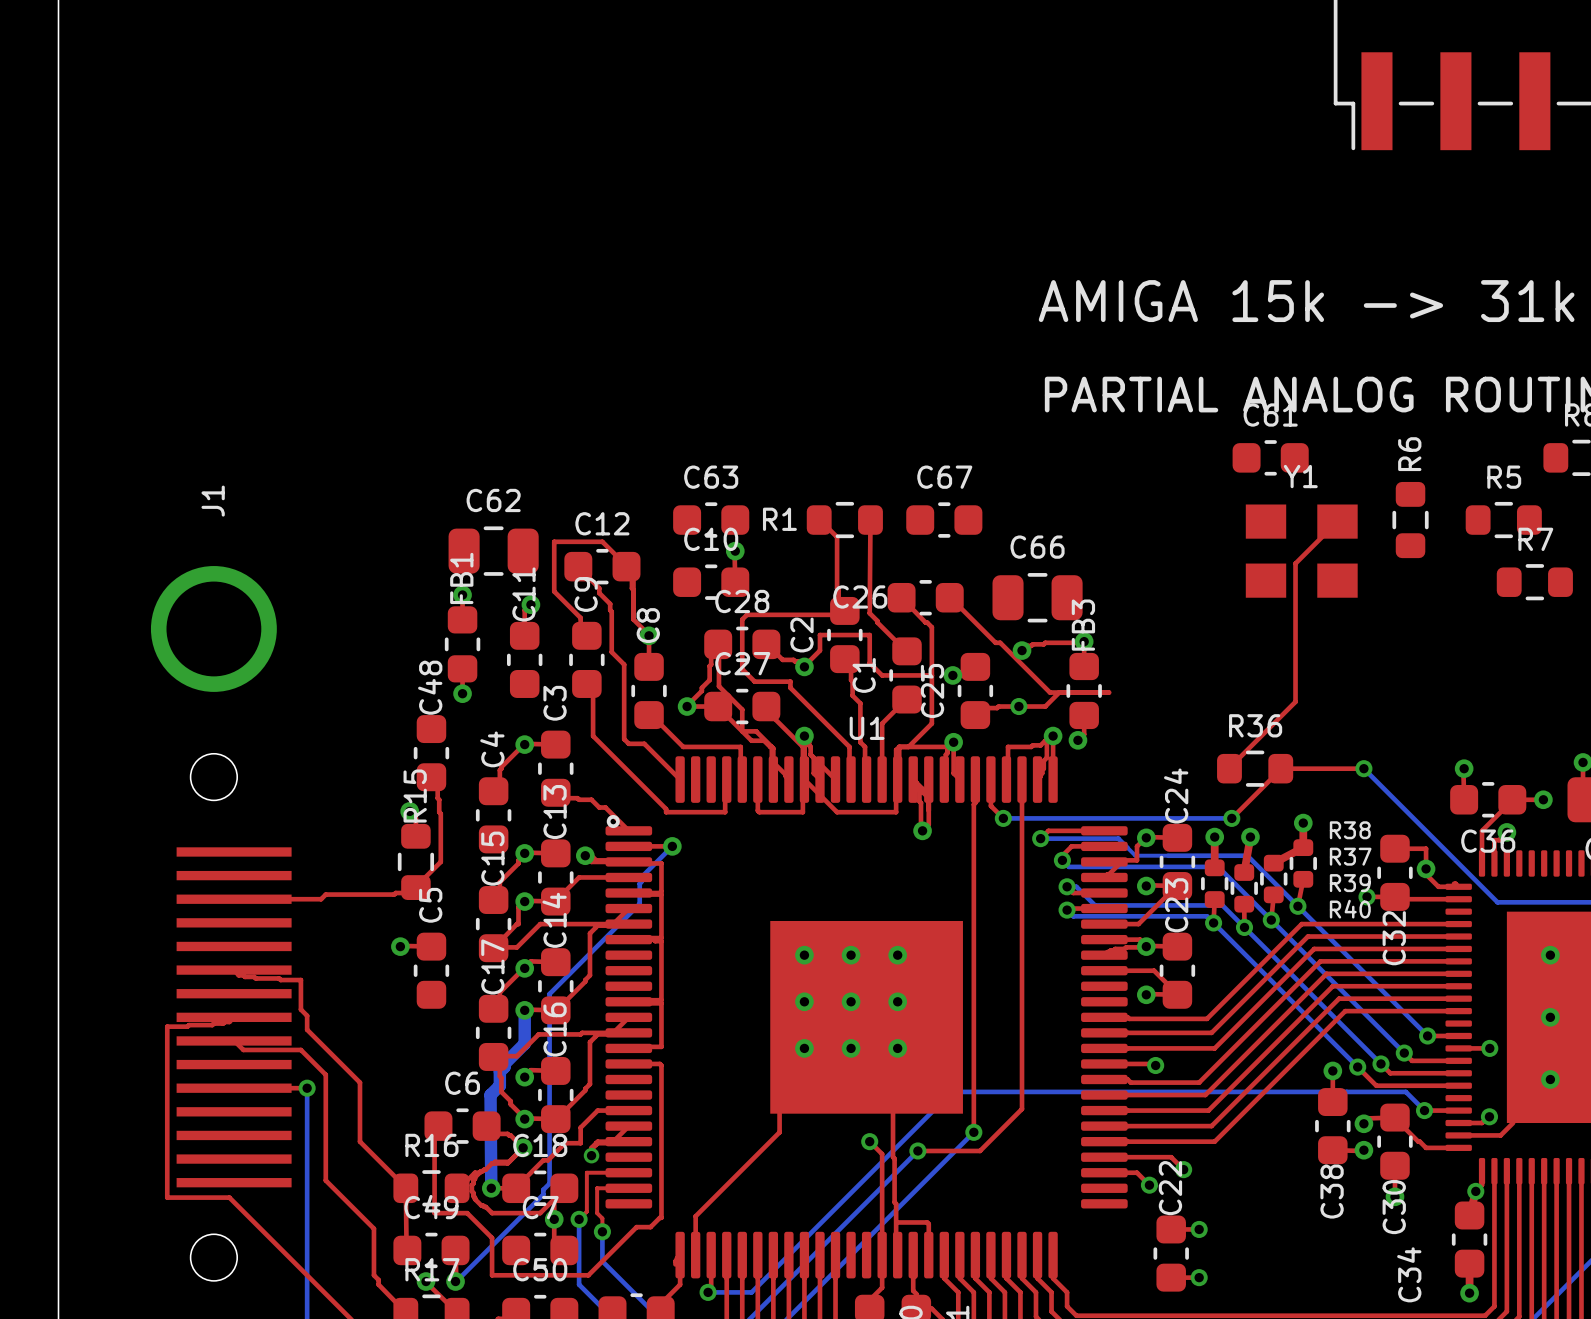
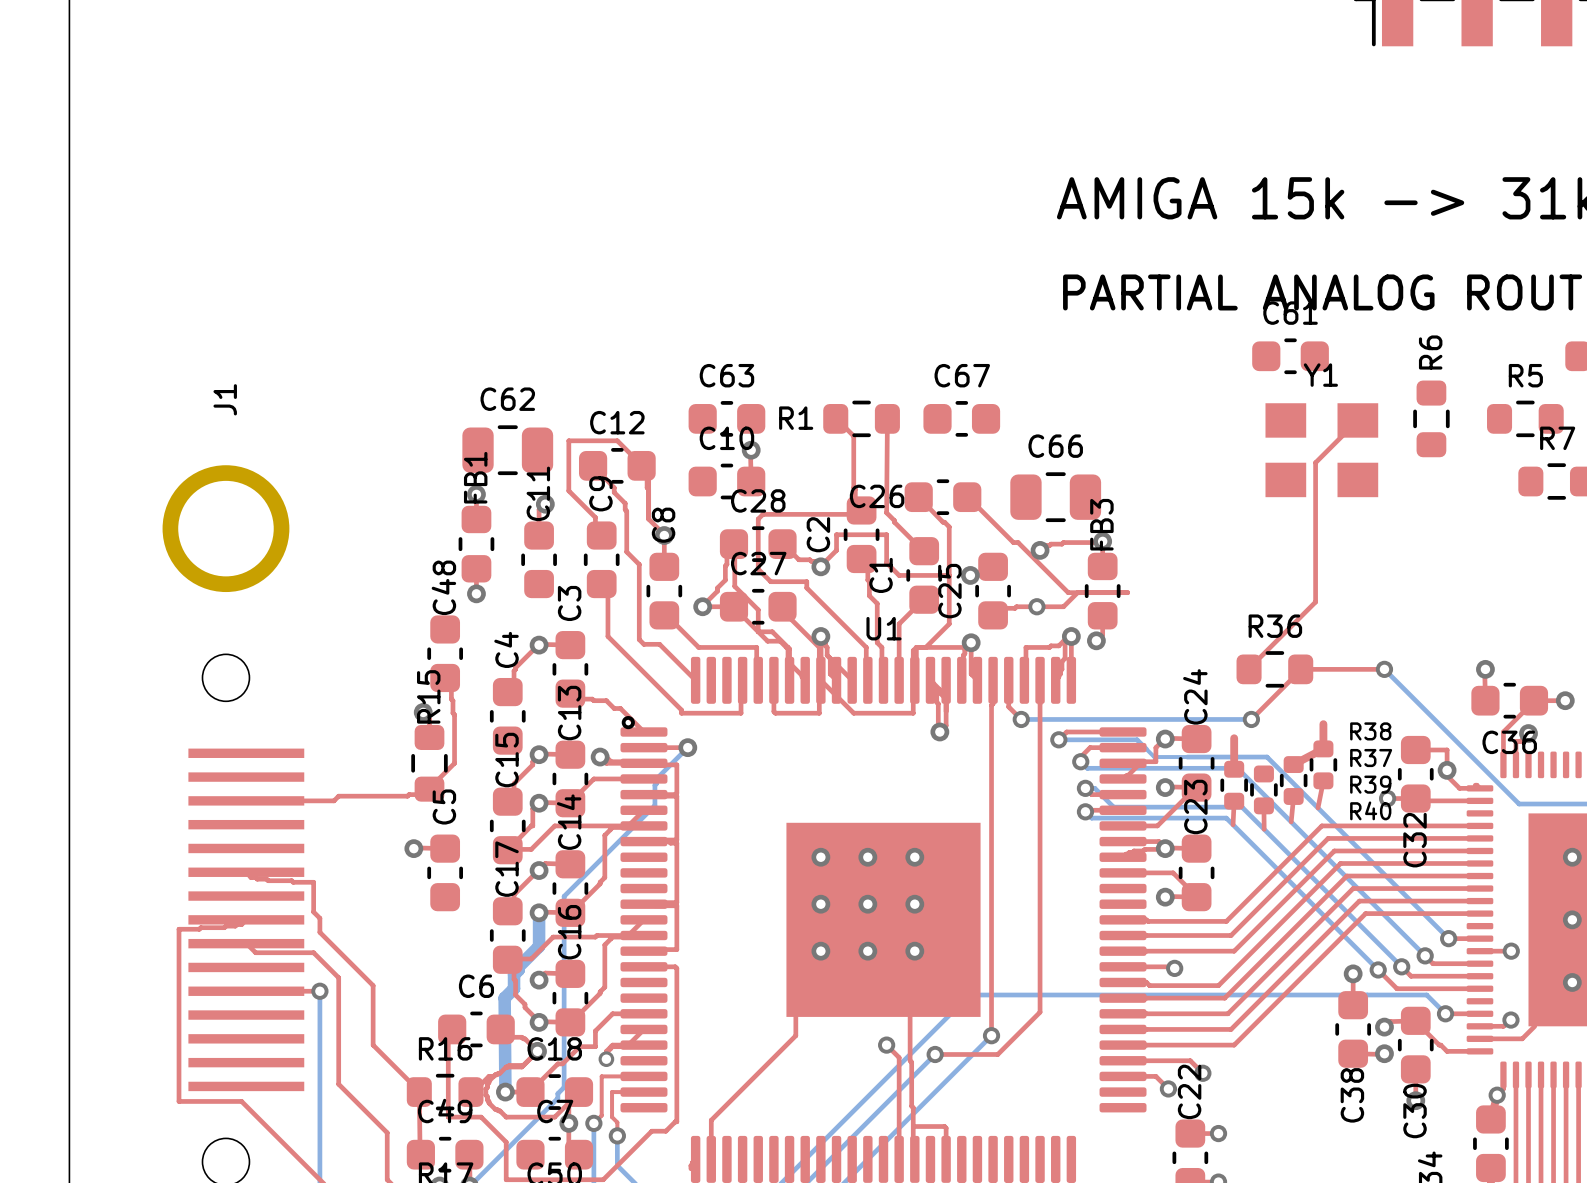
via: (1303, 823) -> none
via: (1214, 837) -> none
top track: (1250, 837) (1244, 872) -> none
via: (1250, 837) -> none
via: (1297, 906) -> none
via: (1271, 920) -> none
via: (1213, 922) -> none
via: (1244, 927) -> none

